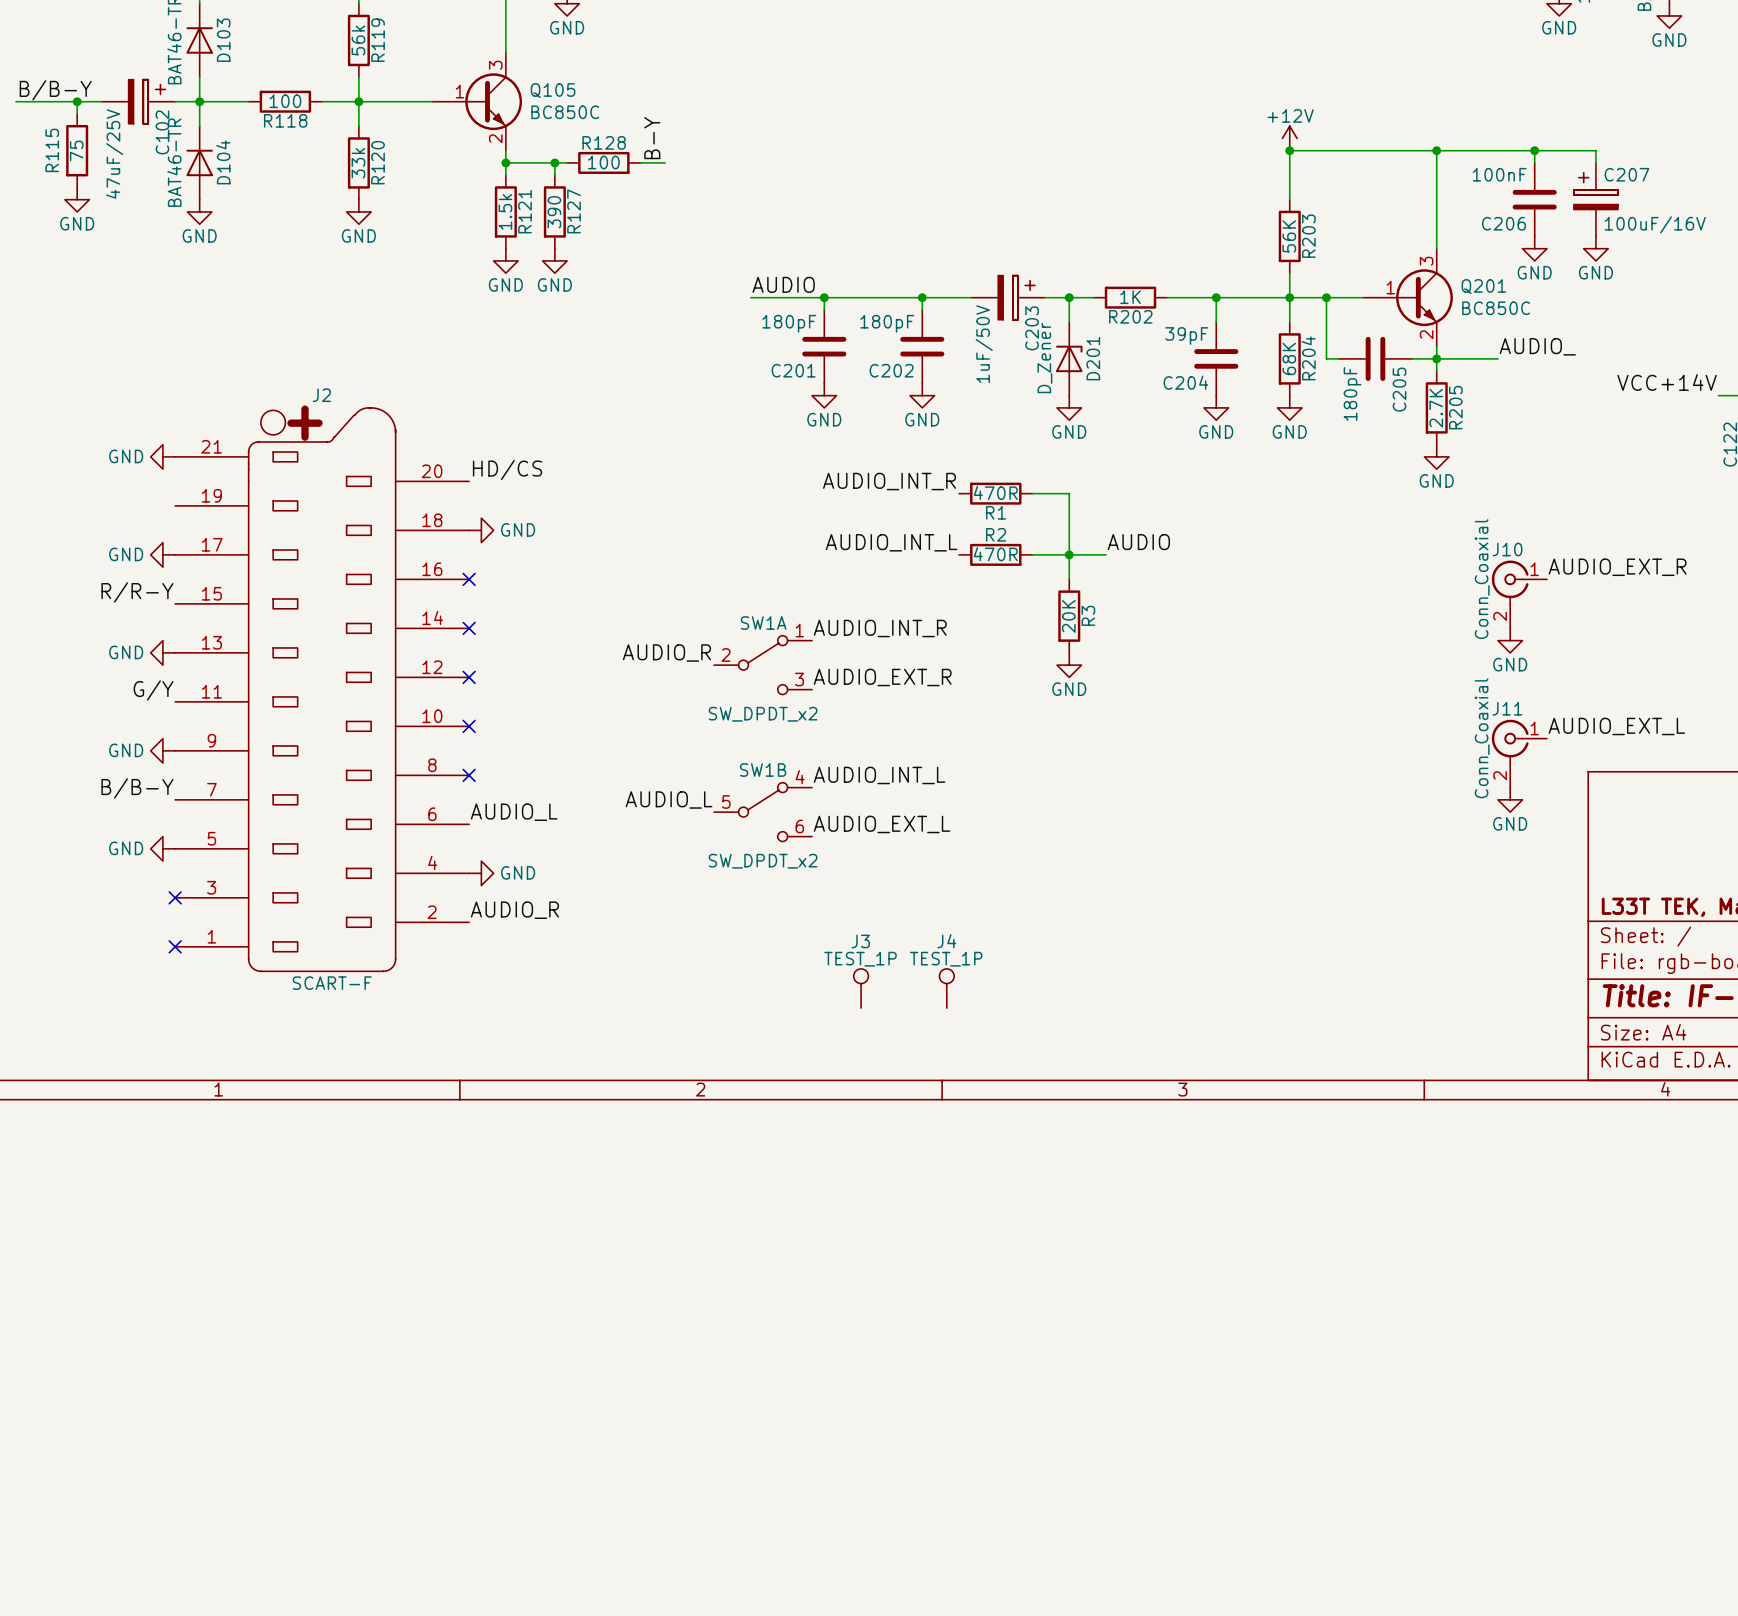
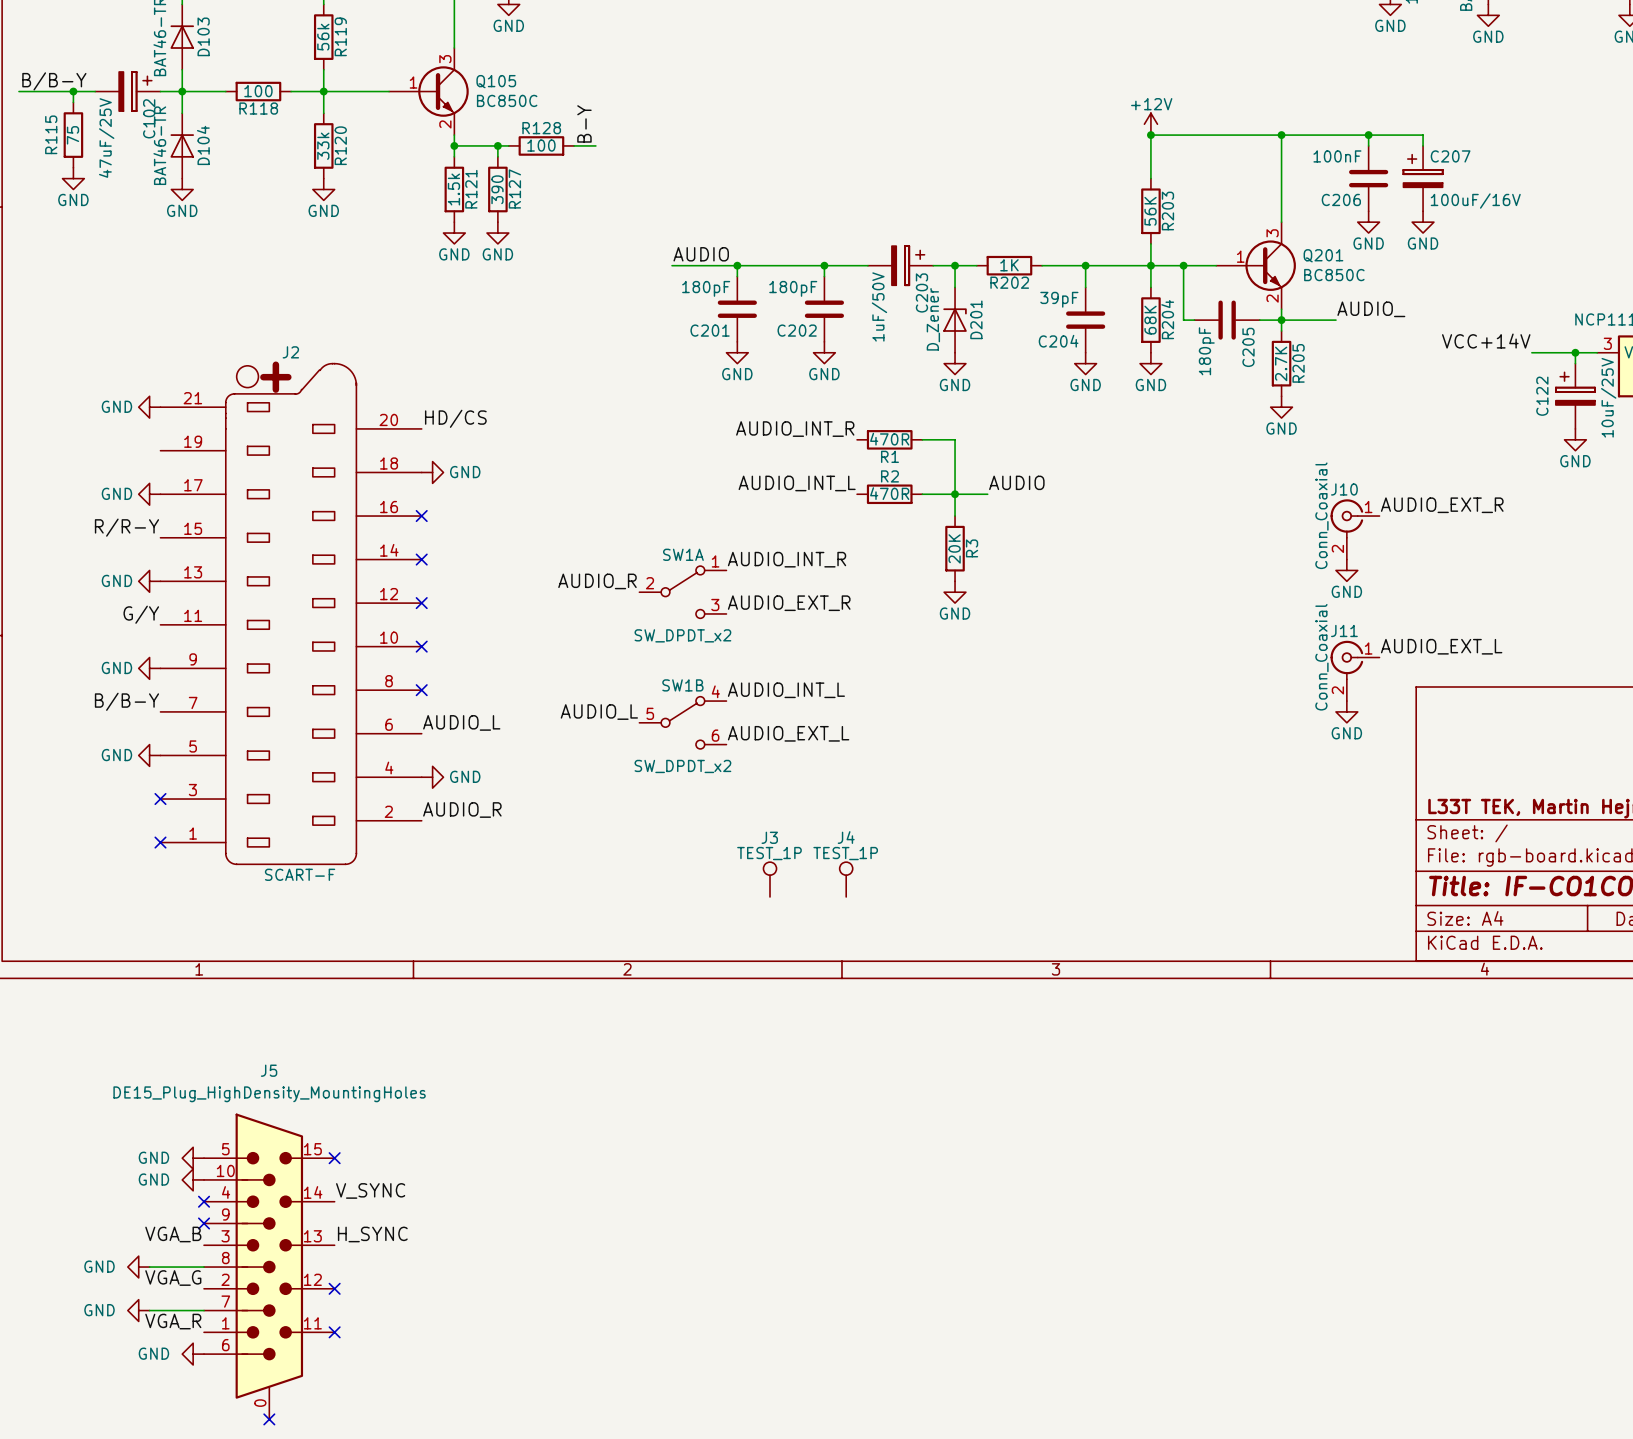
power symbol: none -> GND (193, 1158)
no-connect mark: none -> (334, 1158)
power symbol: none -> GND (193, 1179)
label: none -> V_SYNC (370, 1190)
no-connect mark: none -> (204, 1201)
no-connect mark: none -> (204, 1223)
label: none -> VGA_B (173, 1234)
label: none -> H_SYNC (372, 1234)
J5: none -> DE15_Plug_HighDensity_MountingHoles (269, 1266)
power symbol: none -> GND (138, 1267)
wire: none -> (149, 1267) (204, 1267)
label: none -> VGA_G (173, 1278)
no-connect mark: none -> (334, 1288)
power symbol: none -> GND (138, 1310)
wire: none -> (149, 1310) (204, 1310)
label: none -> VGA_R (173, 1321)
no-connect mark: none -> (334, 1332)
power symbol: none -> GND (193, 1354)
no-connect mark: none -> (269, 1419)

